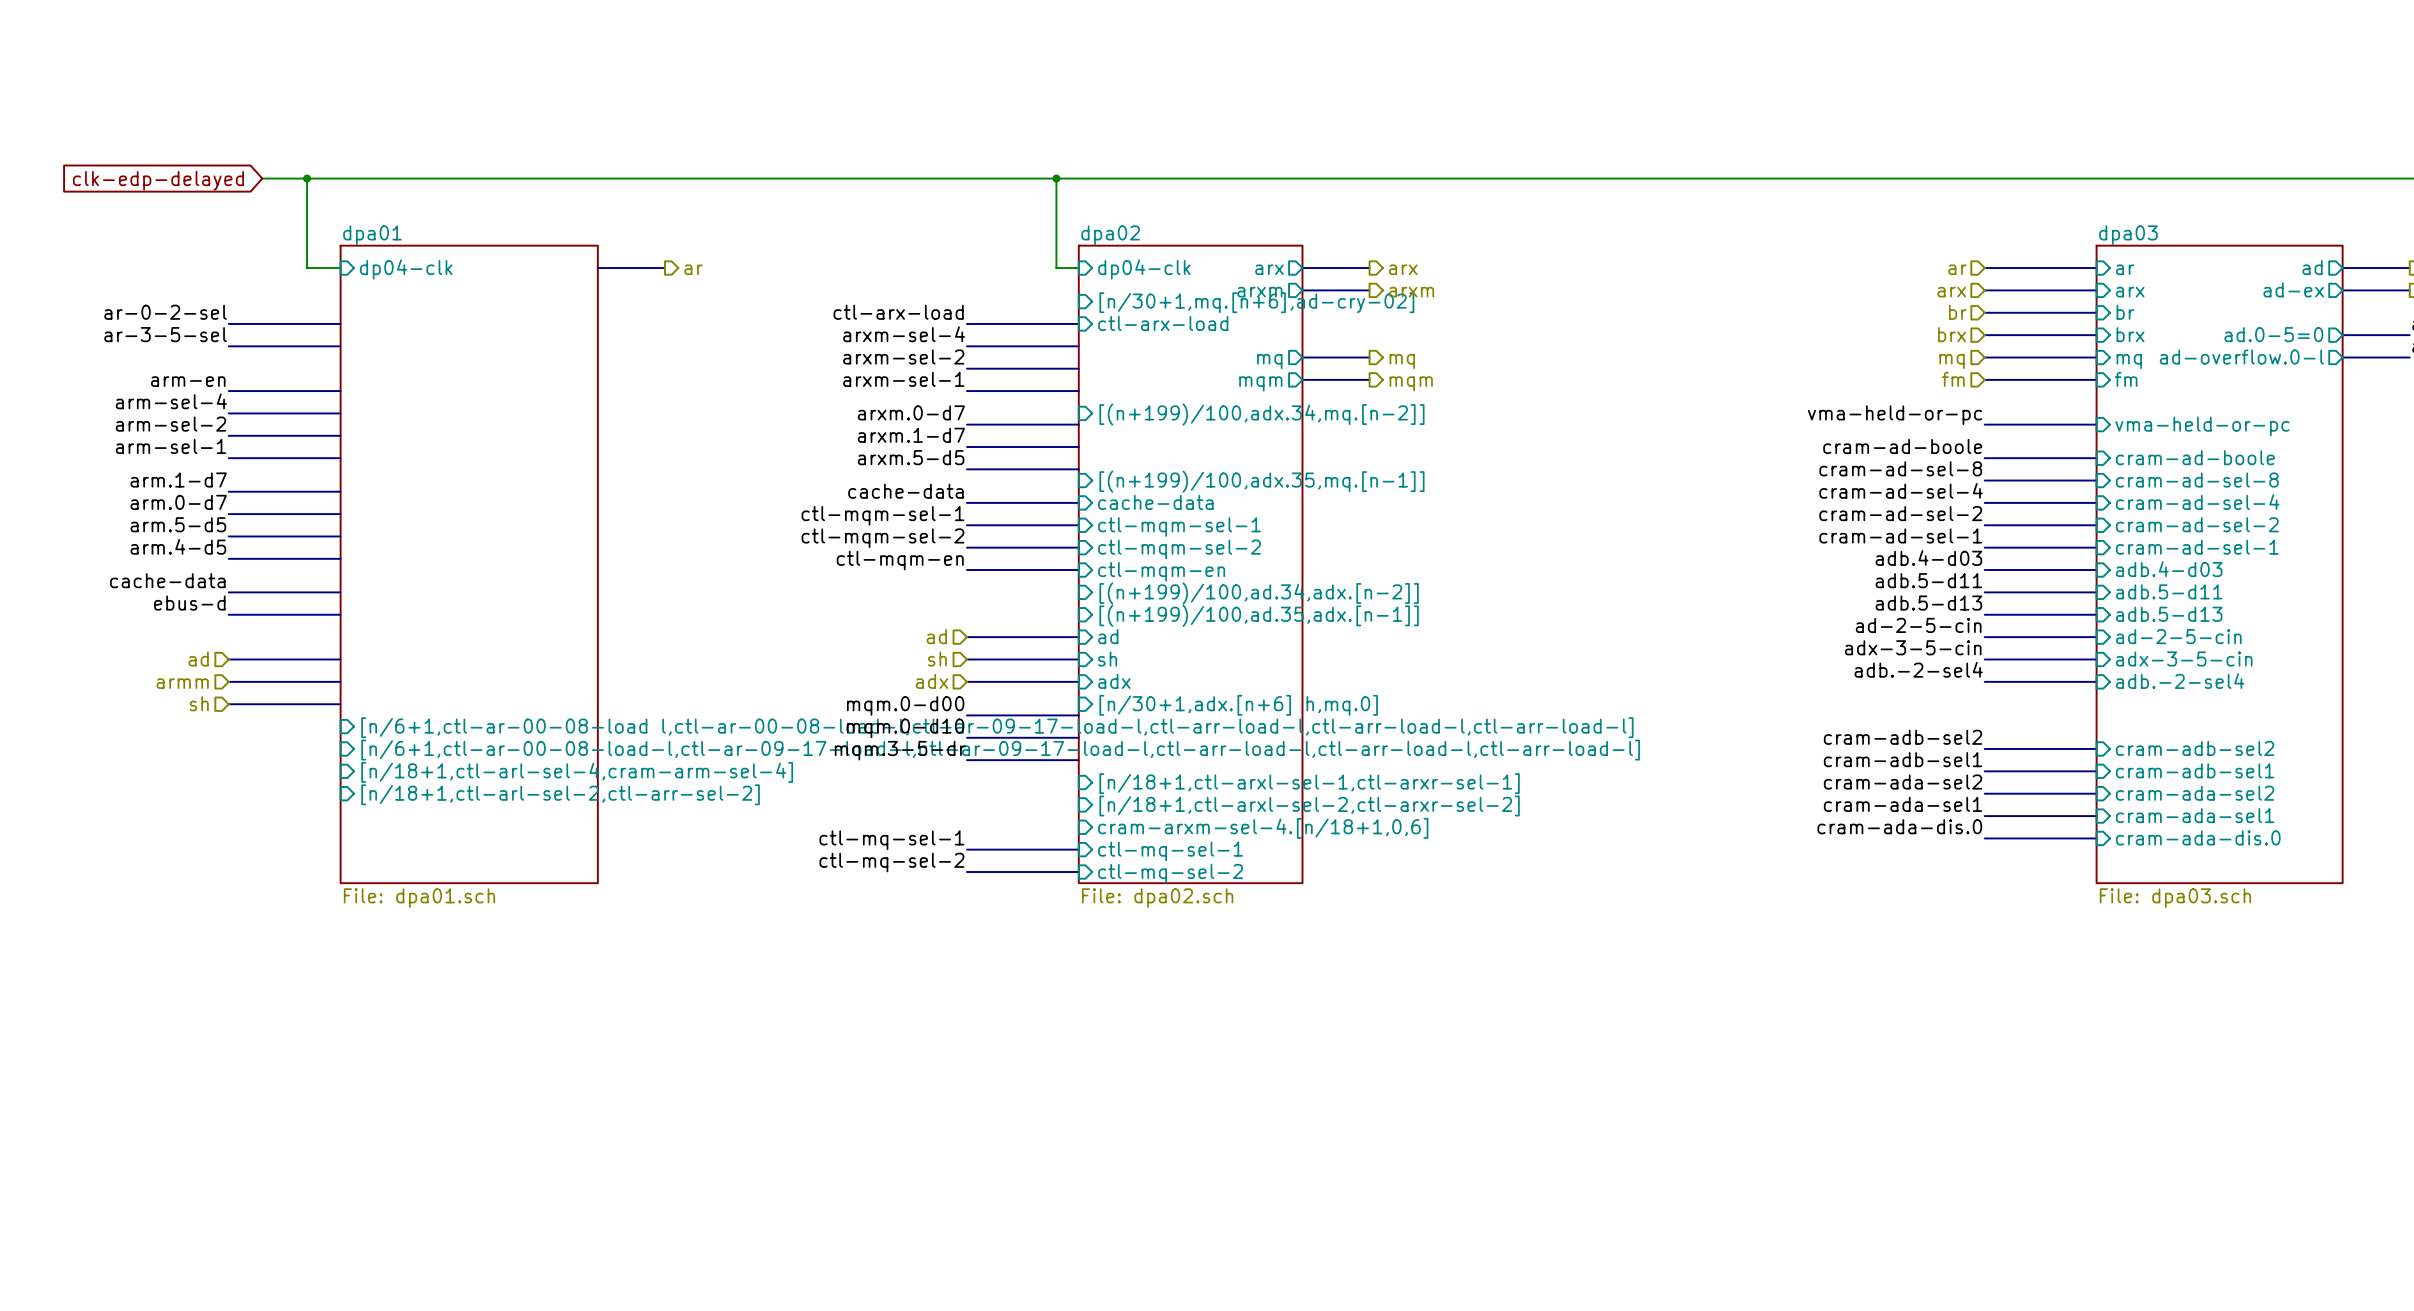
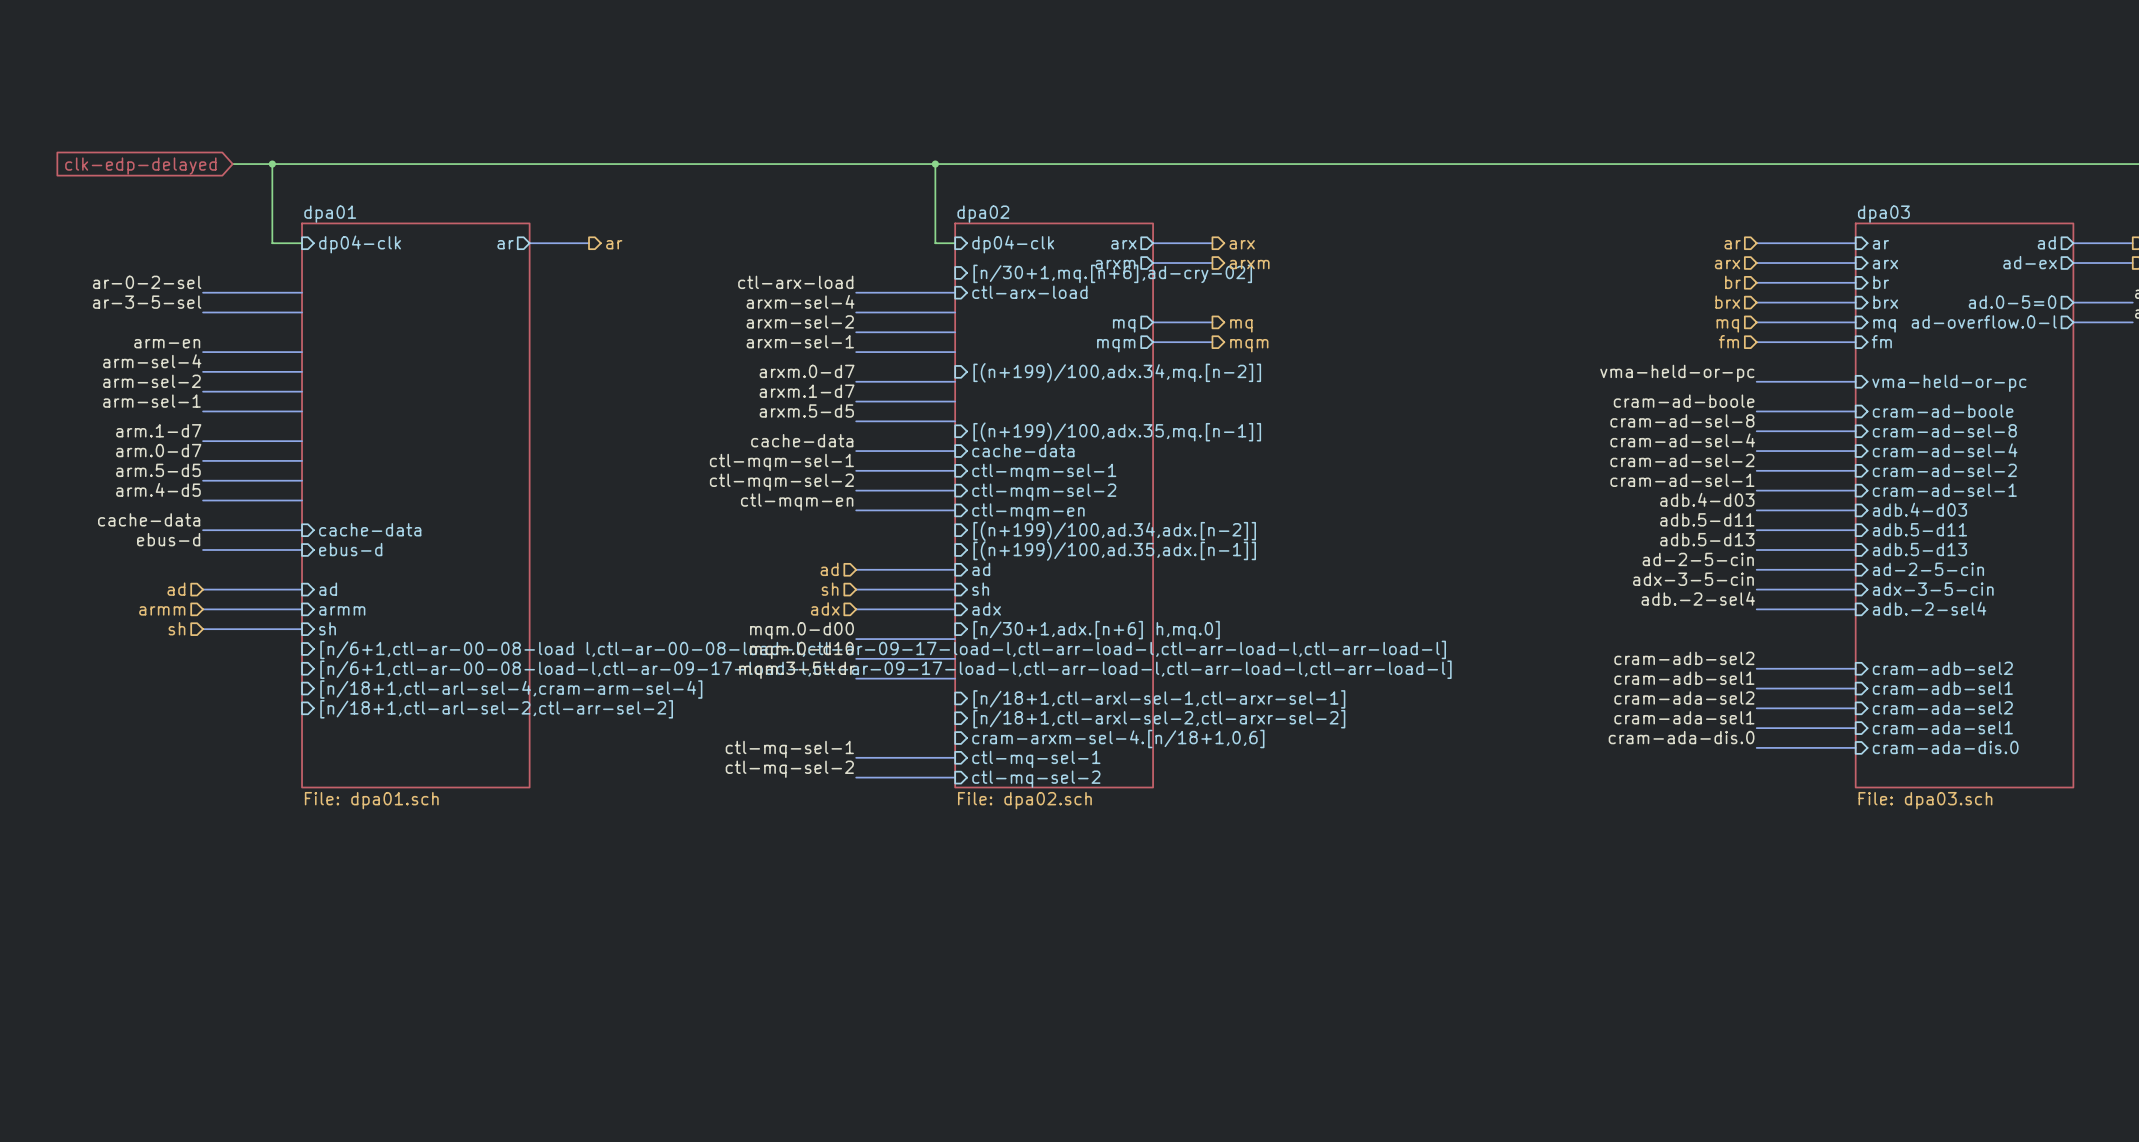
sheet pin: none -> ar (505, 244)
sheet pin: none -> cache-data (370, 529)
sheet pin: none -> ebus-d (350, 549)
sheet pin: none -> ad (328, 589)
sheet pin: none -> armm (342, 610)
sheet pin: none -> sh (327, 628)

